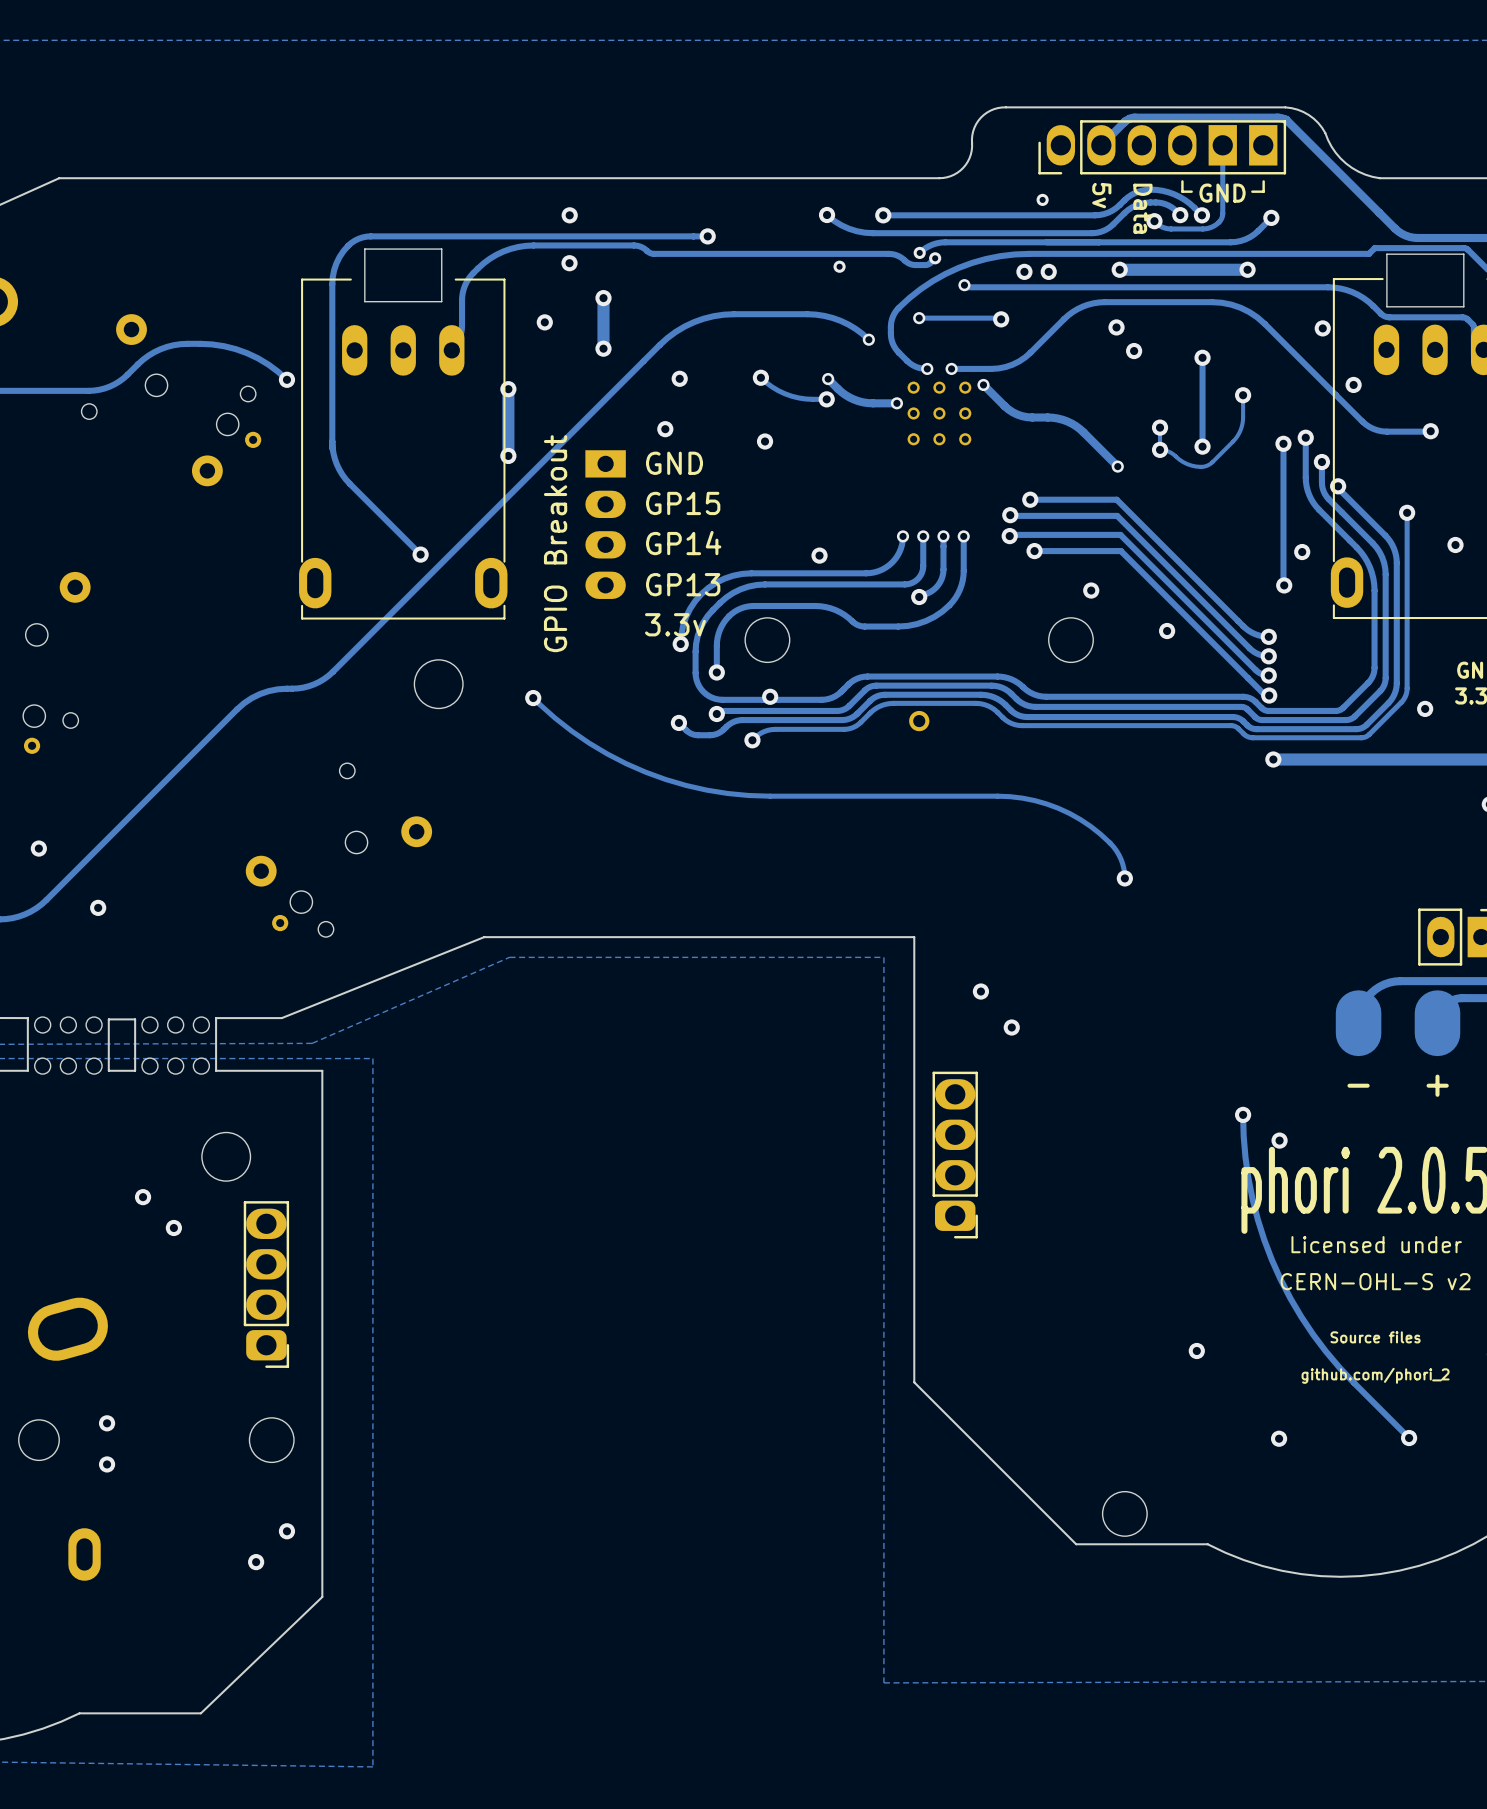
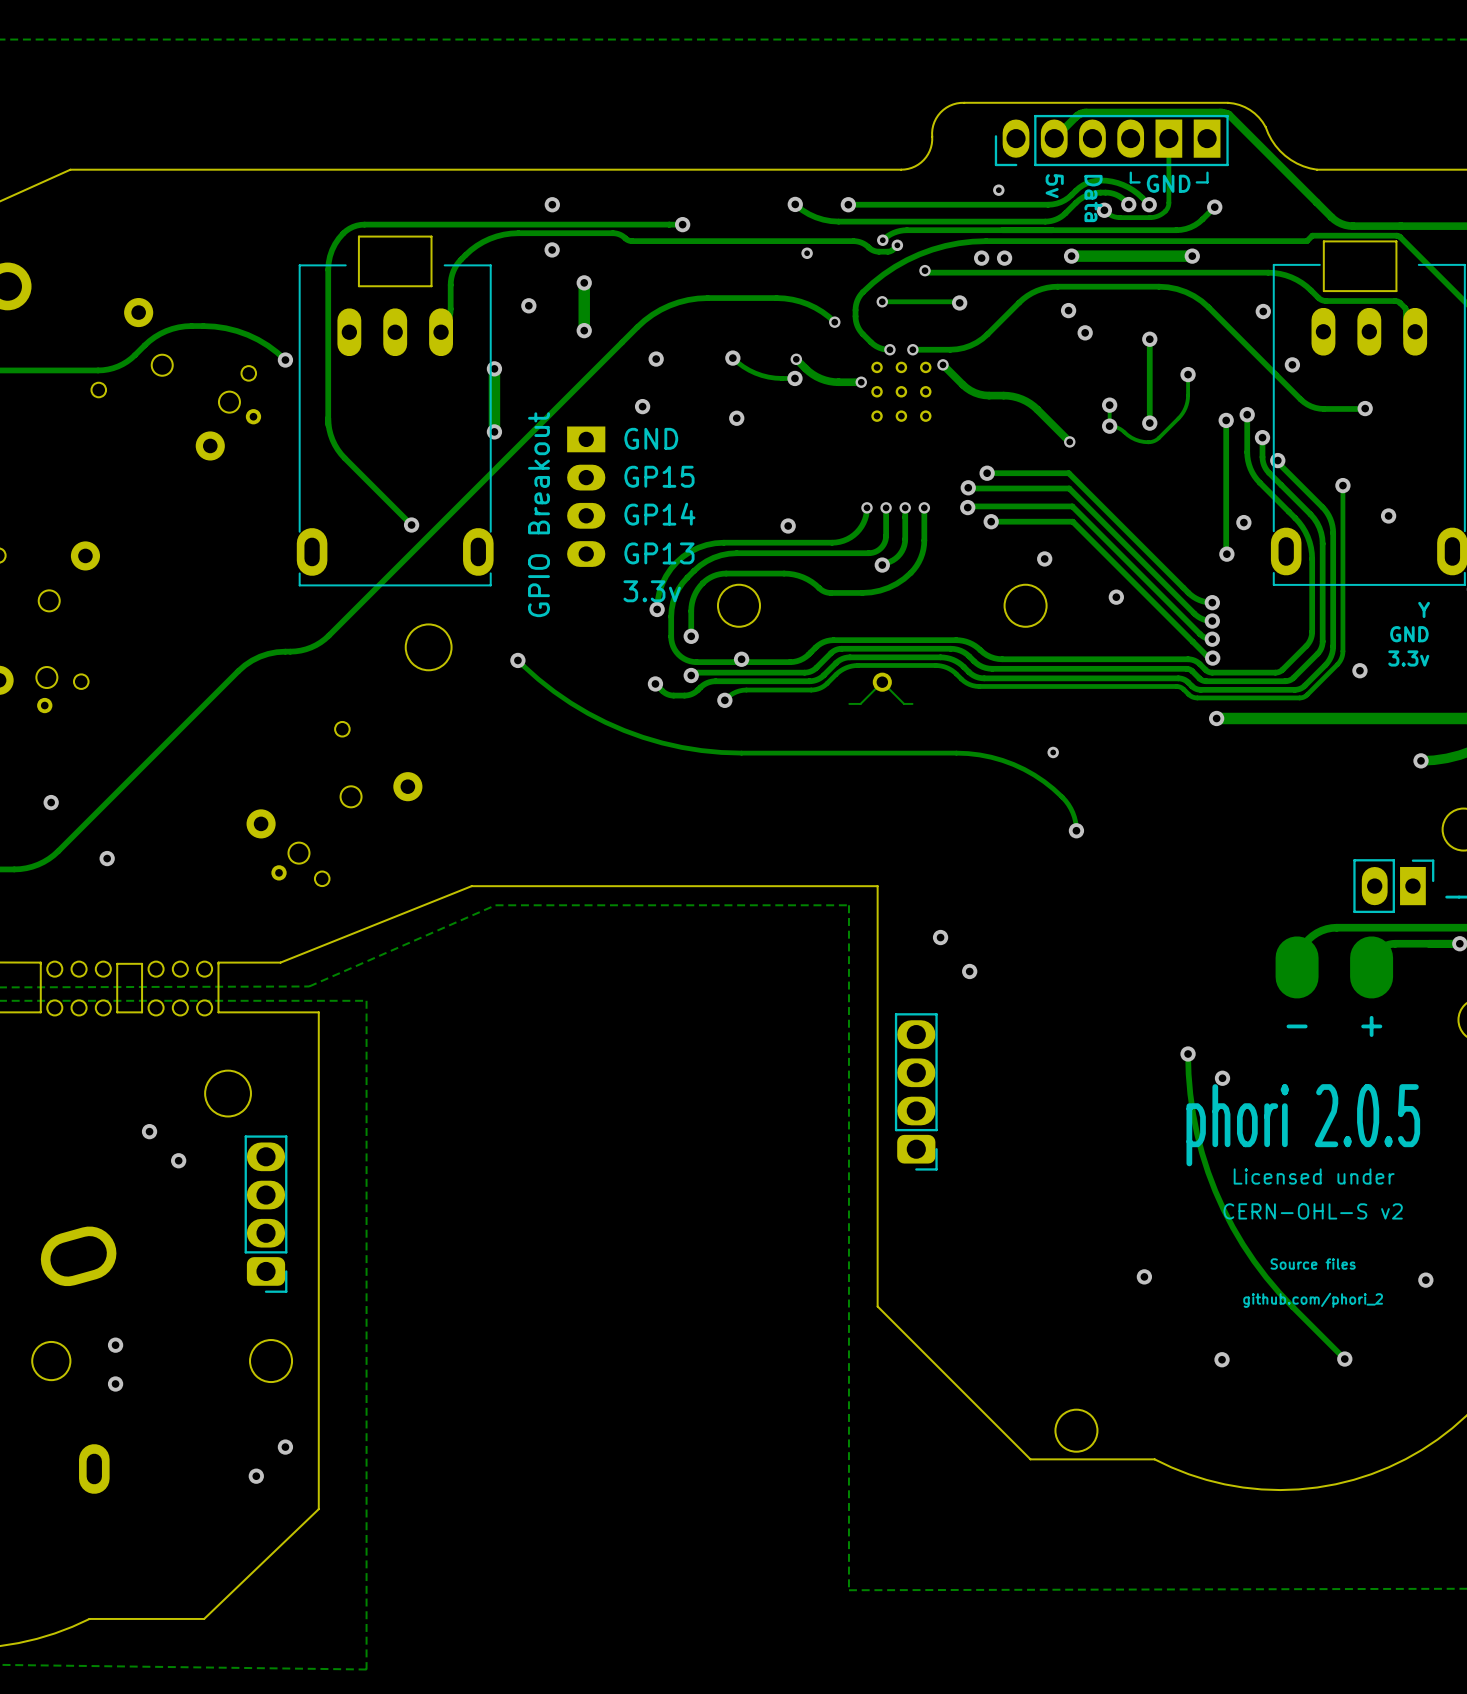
track: none -> (912, 703) (904, 703) (882, 682) (860, 703) (849, 703)
via: none -> (1053, 752)

